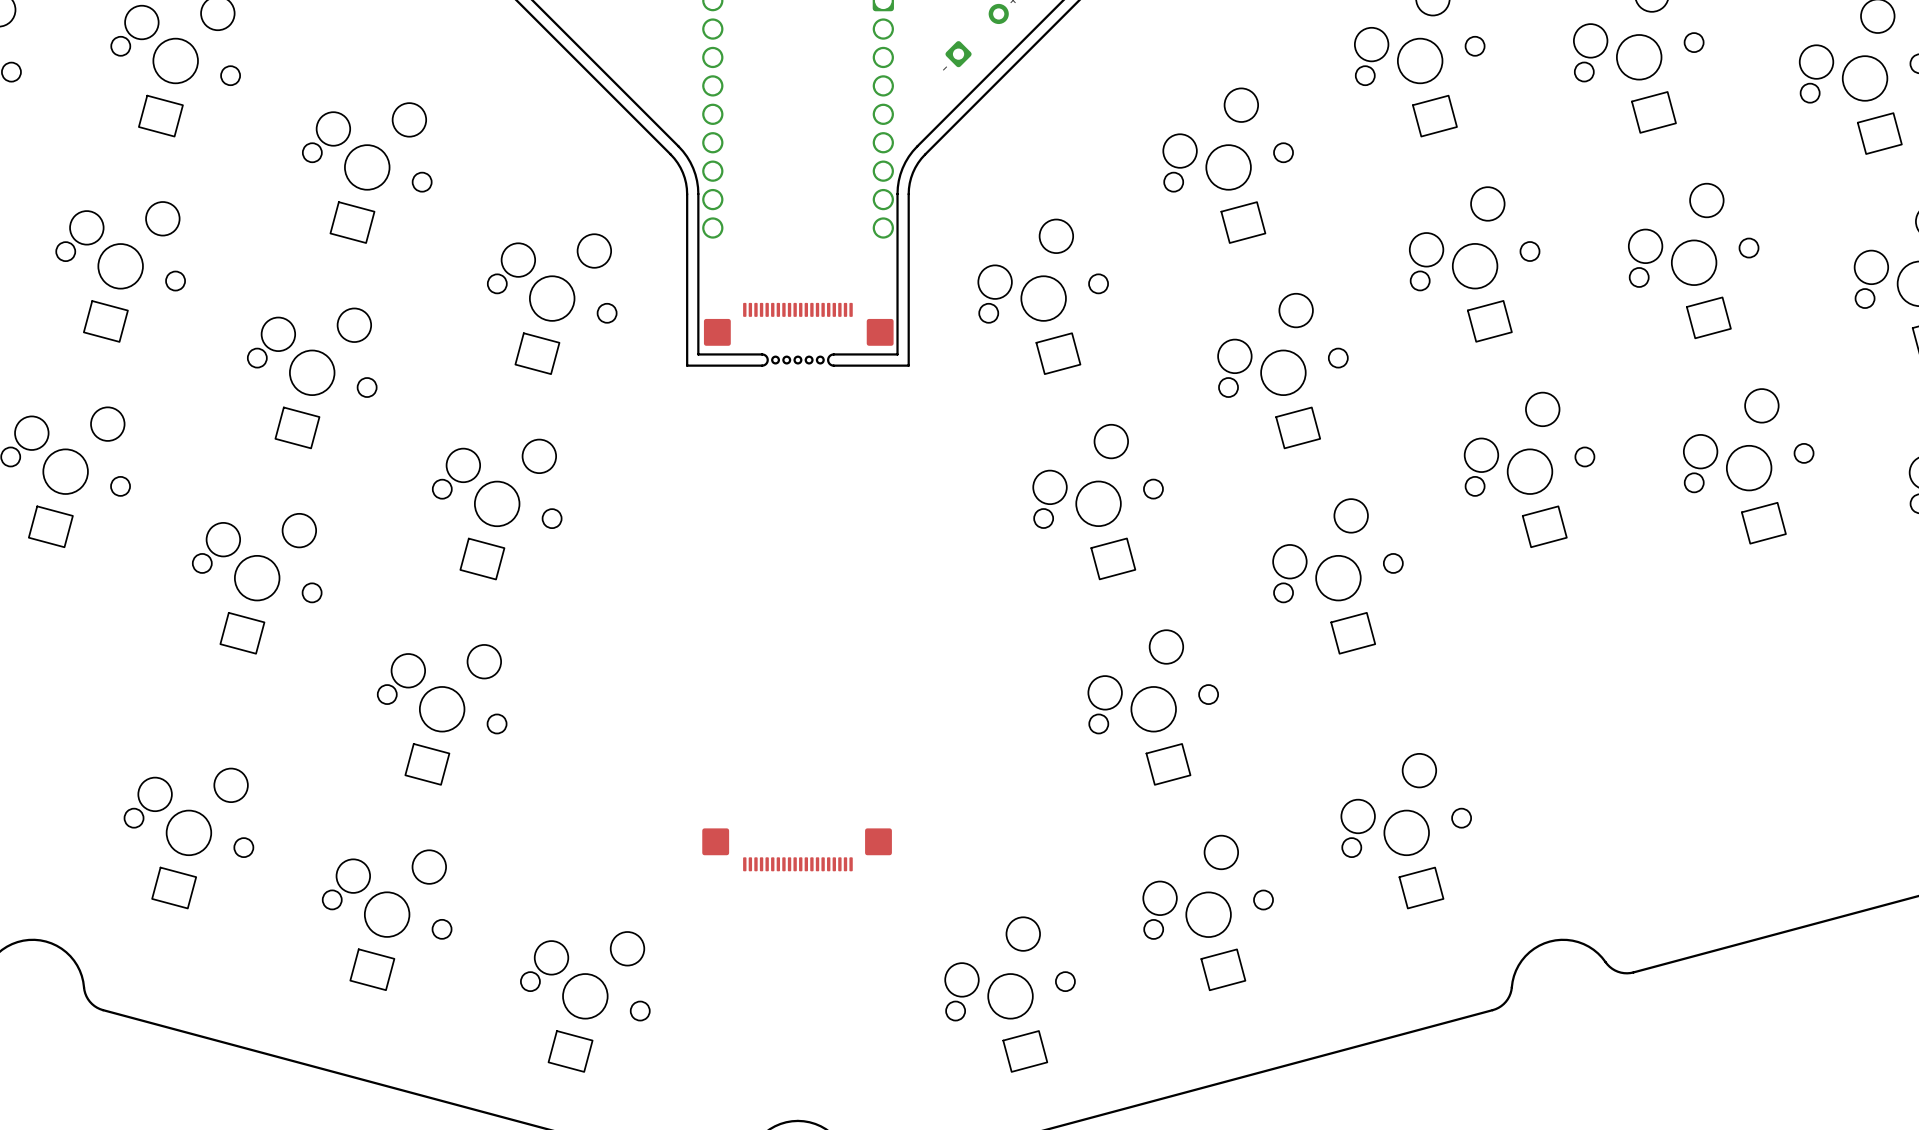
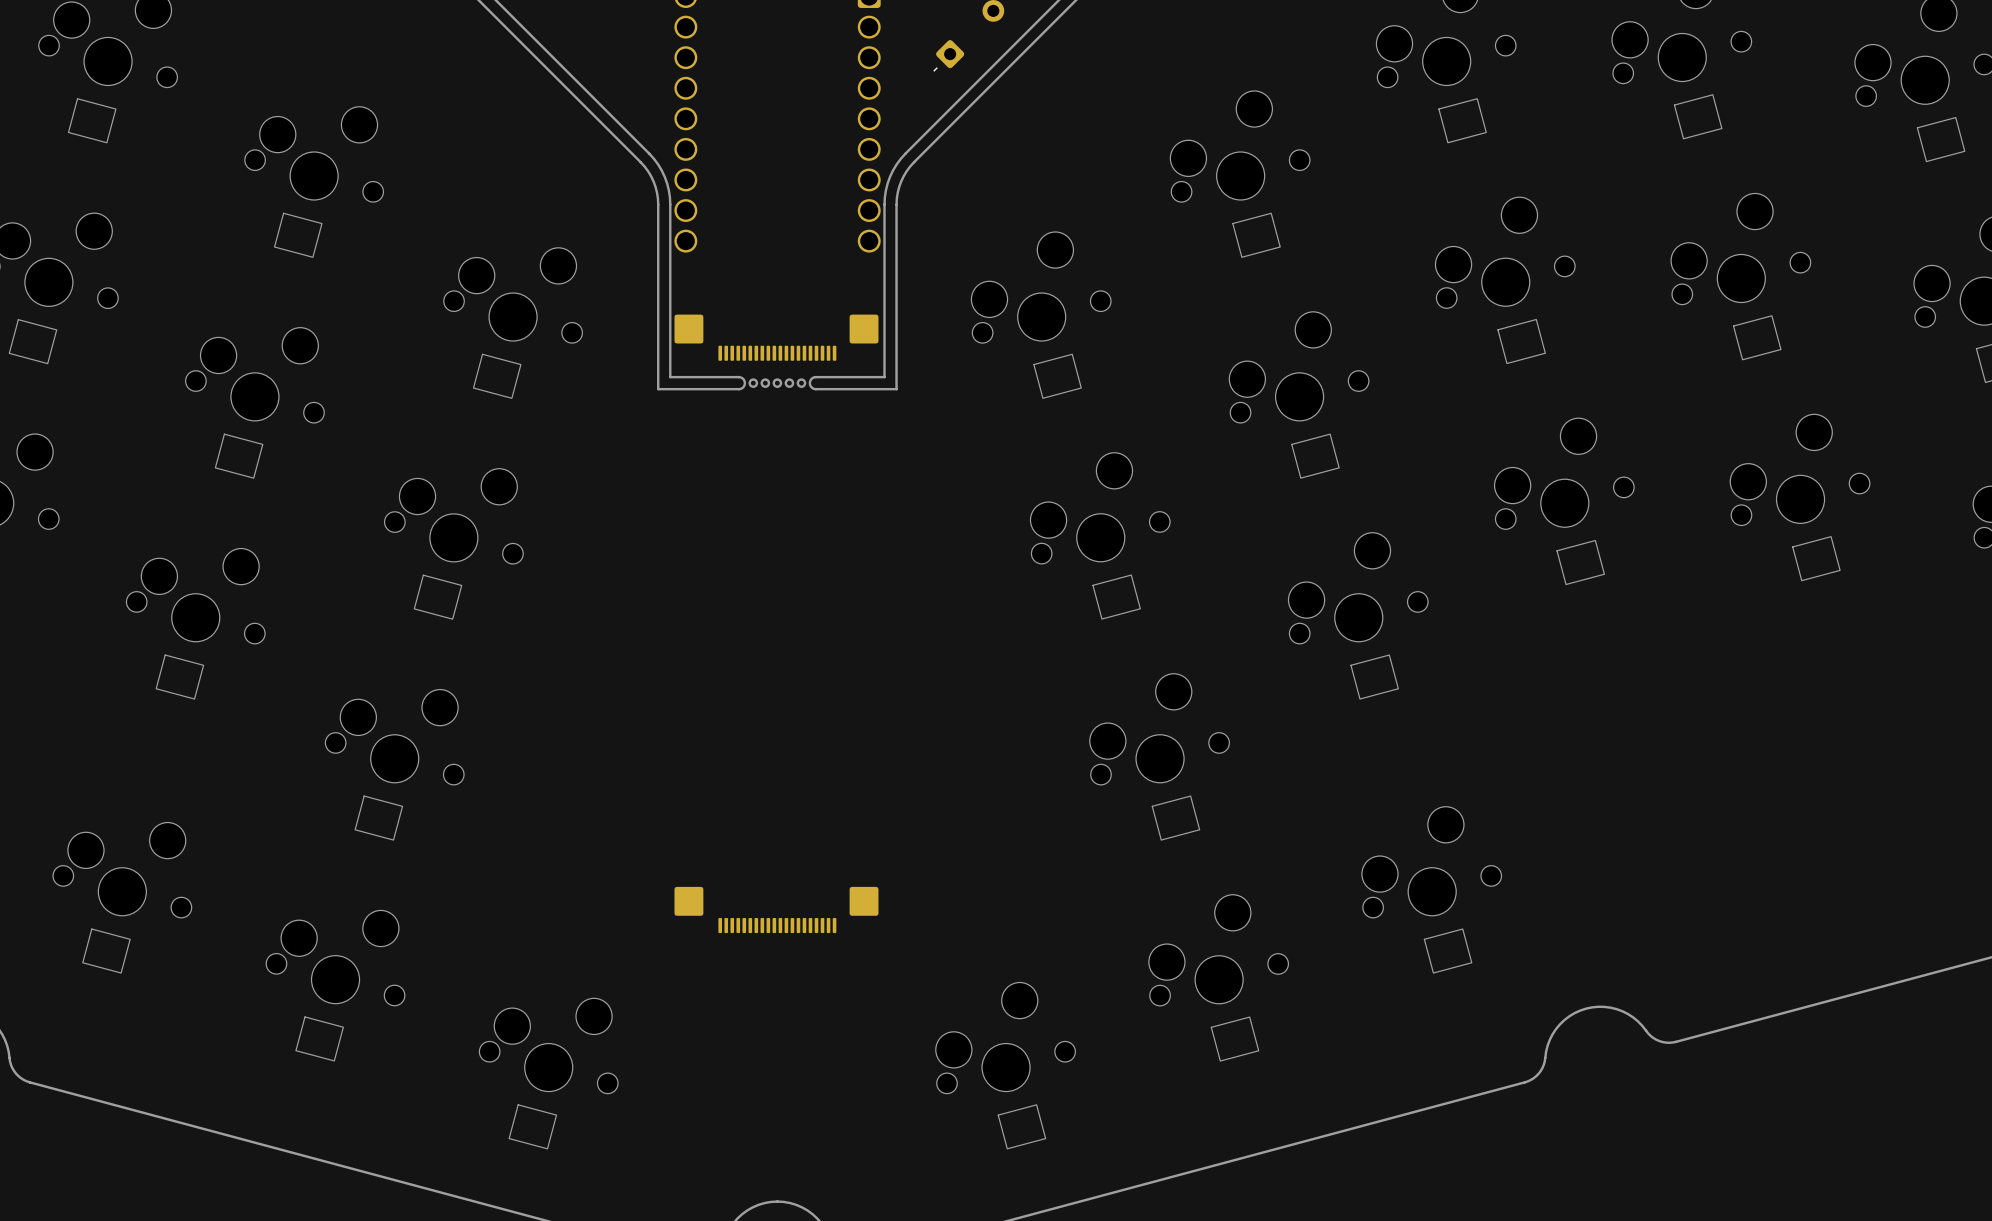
part rotation: 0° (798, 324) -> 180° (776, 337)

